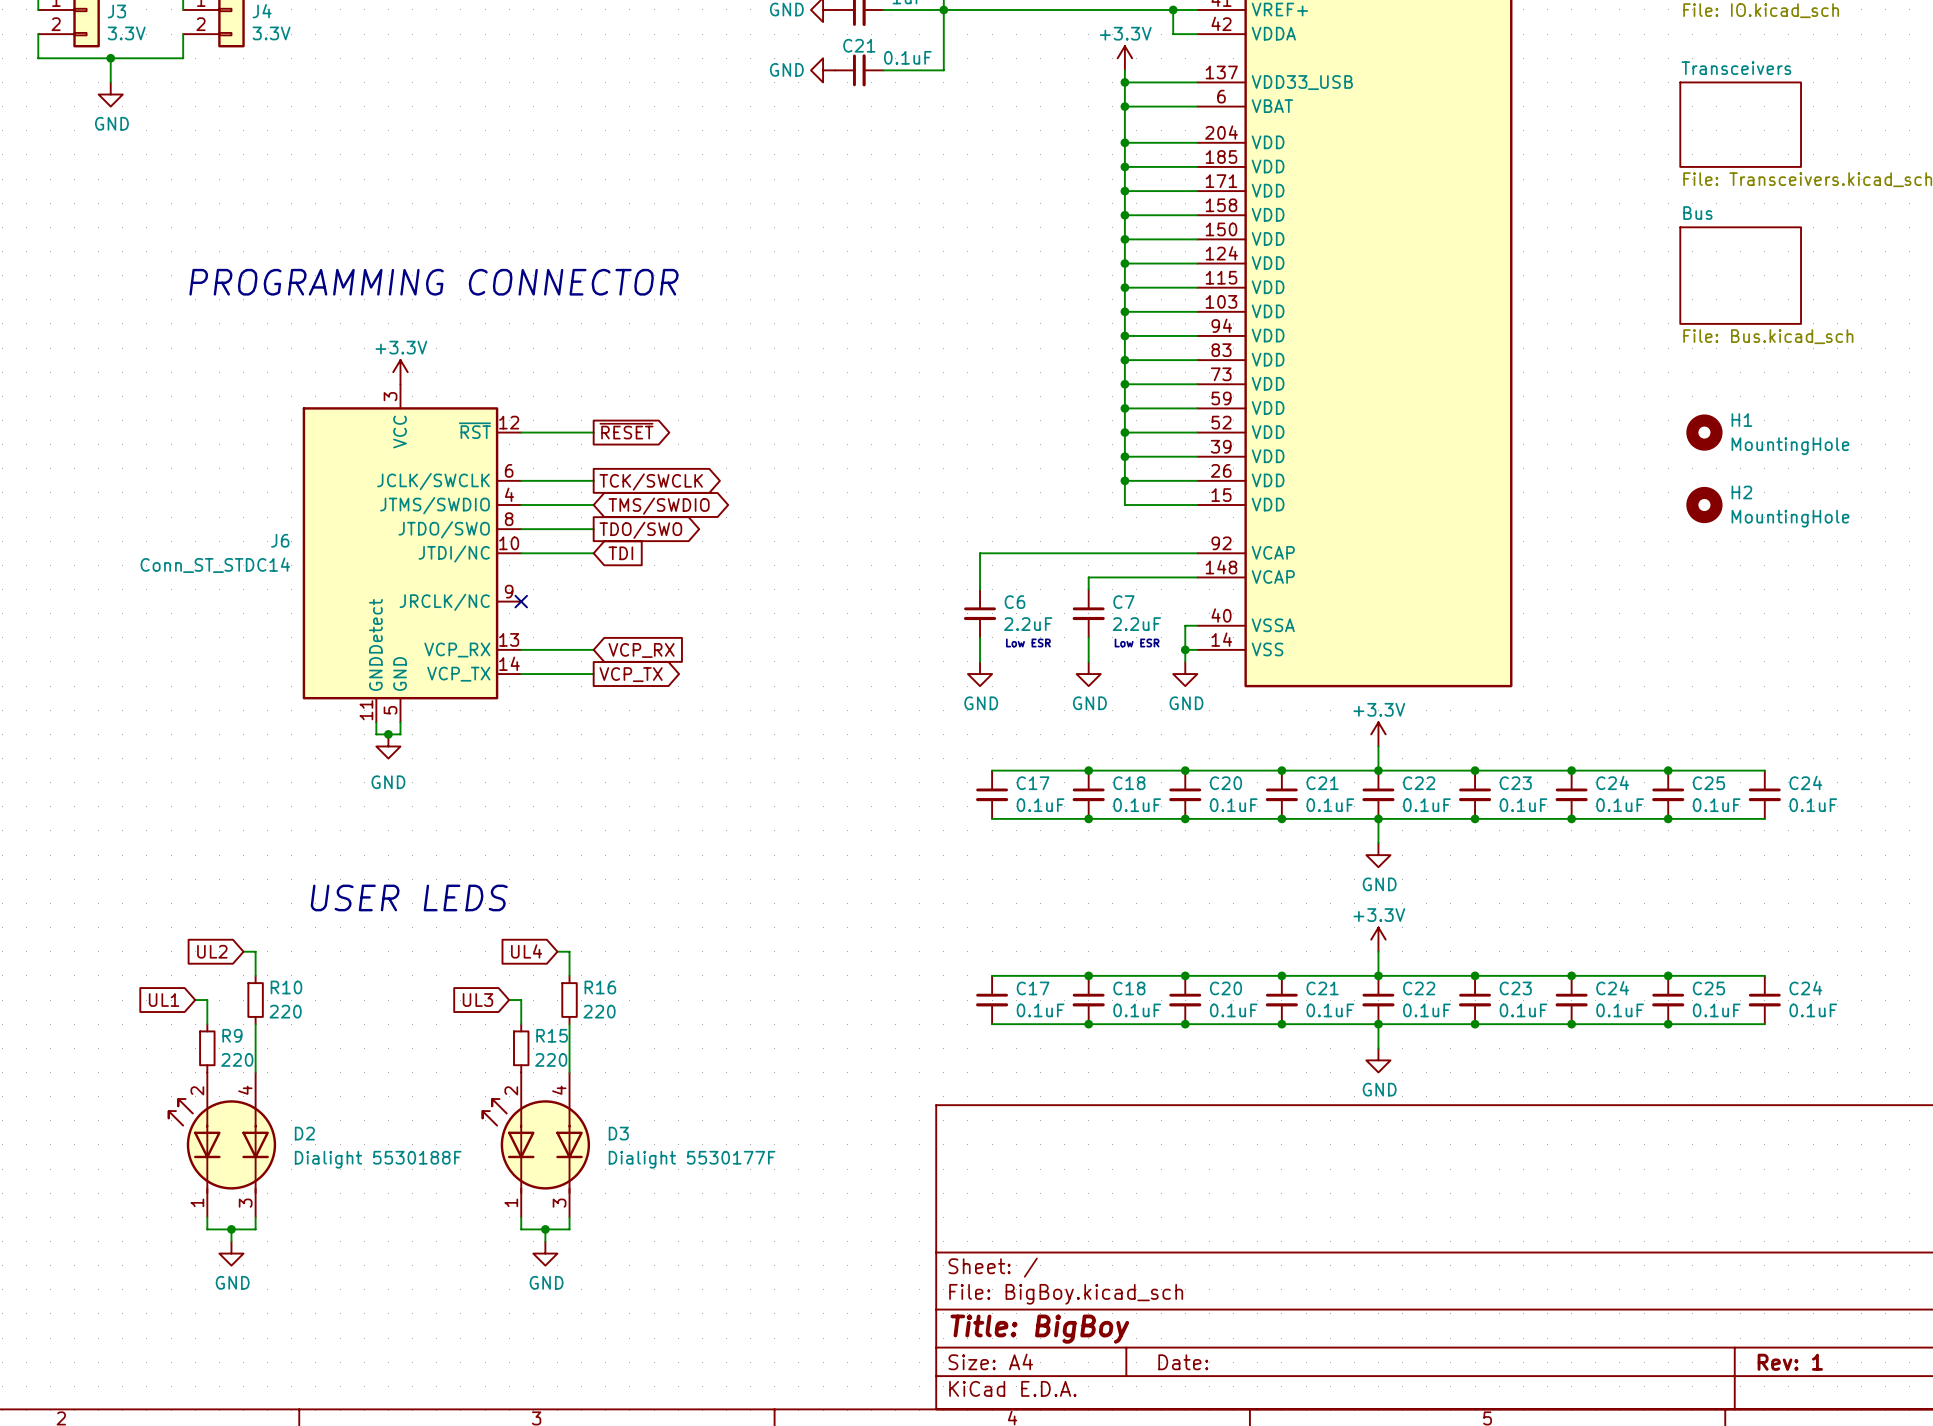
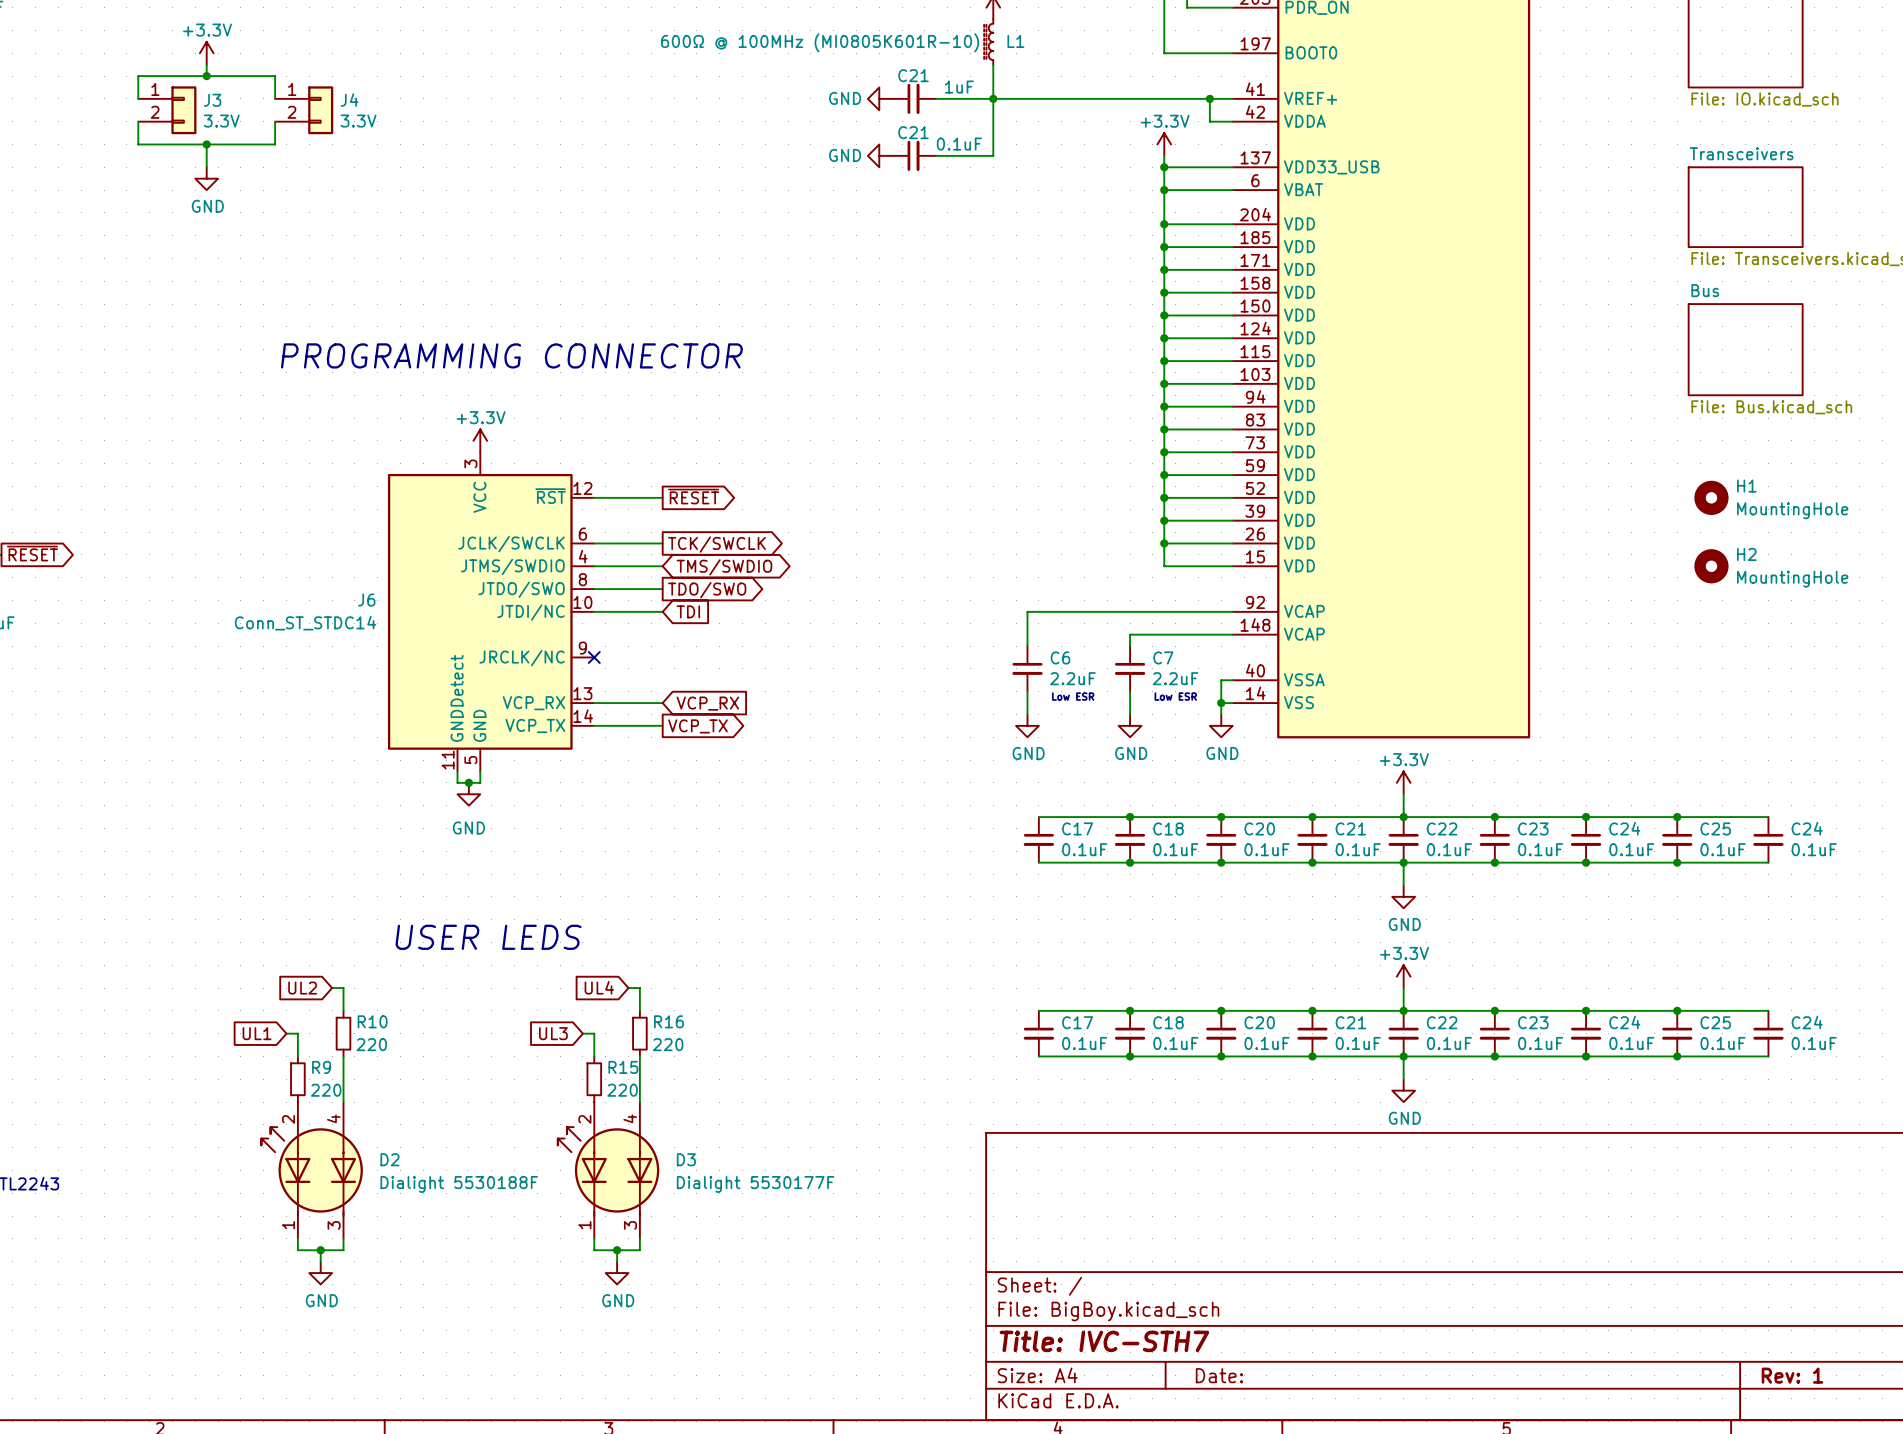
title block: Title: BigBoy (1039, 1329) -> Title: IVC-STH7 (1104, 1341)

